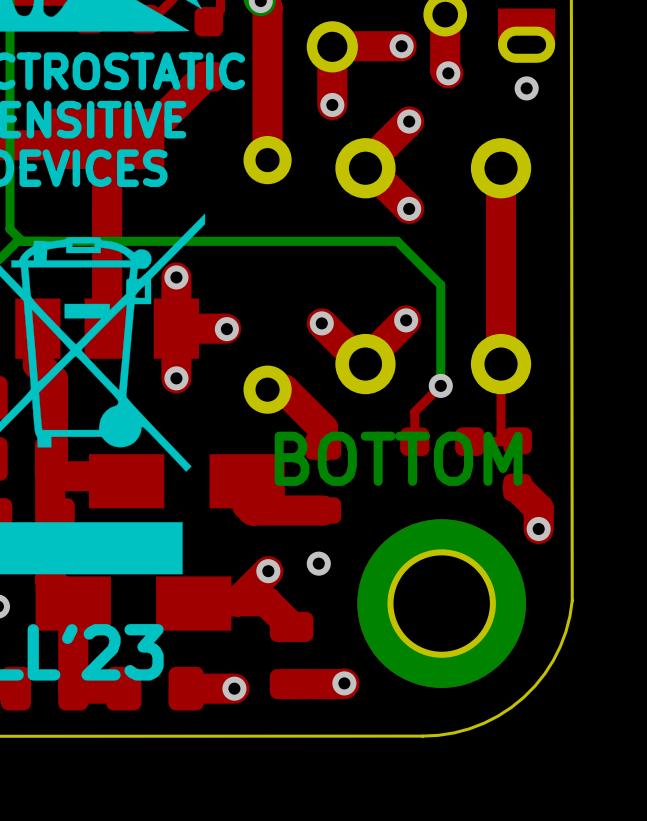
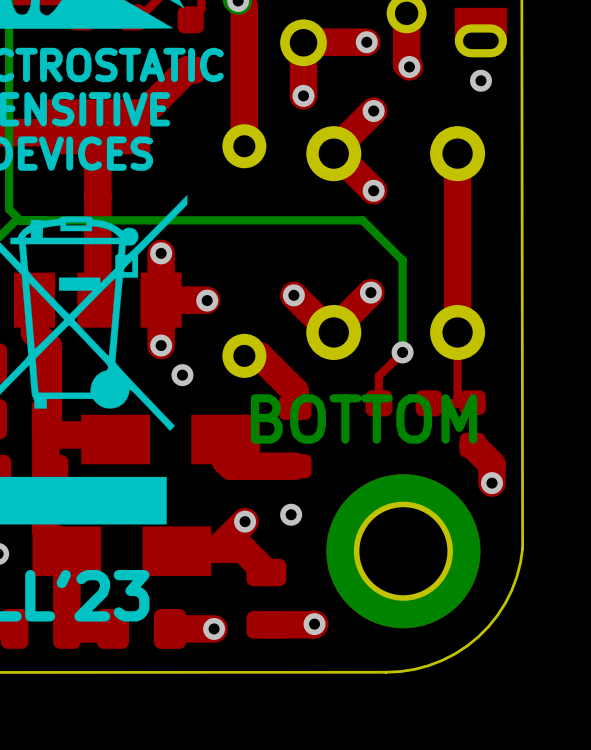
via: none -> (182, 375)

